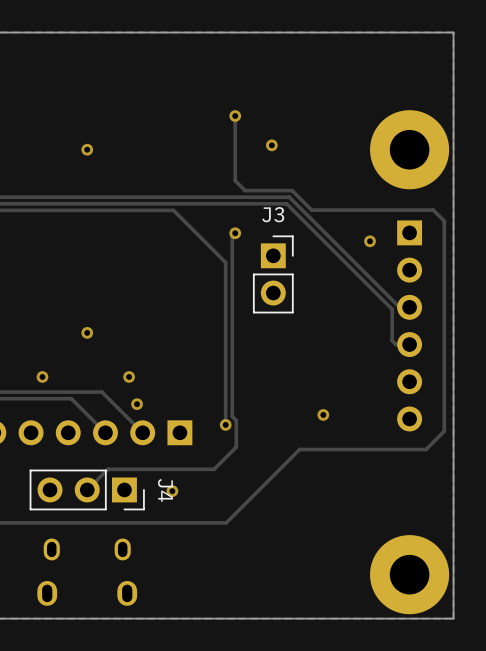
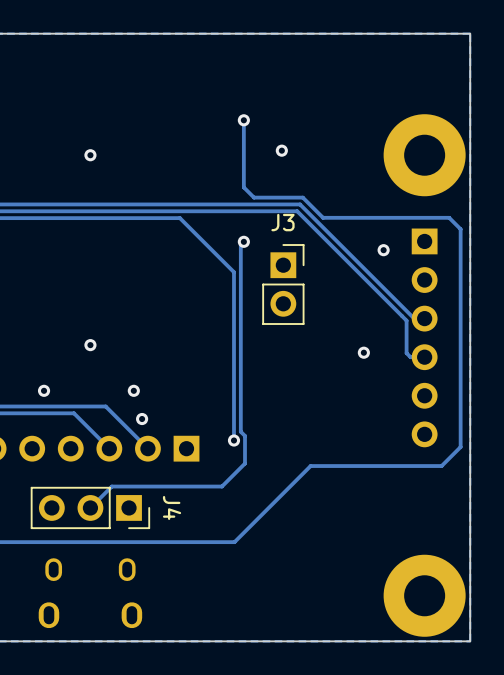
via position: (323, 414) -> (363, 352)
via: (172, 491) -> none

